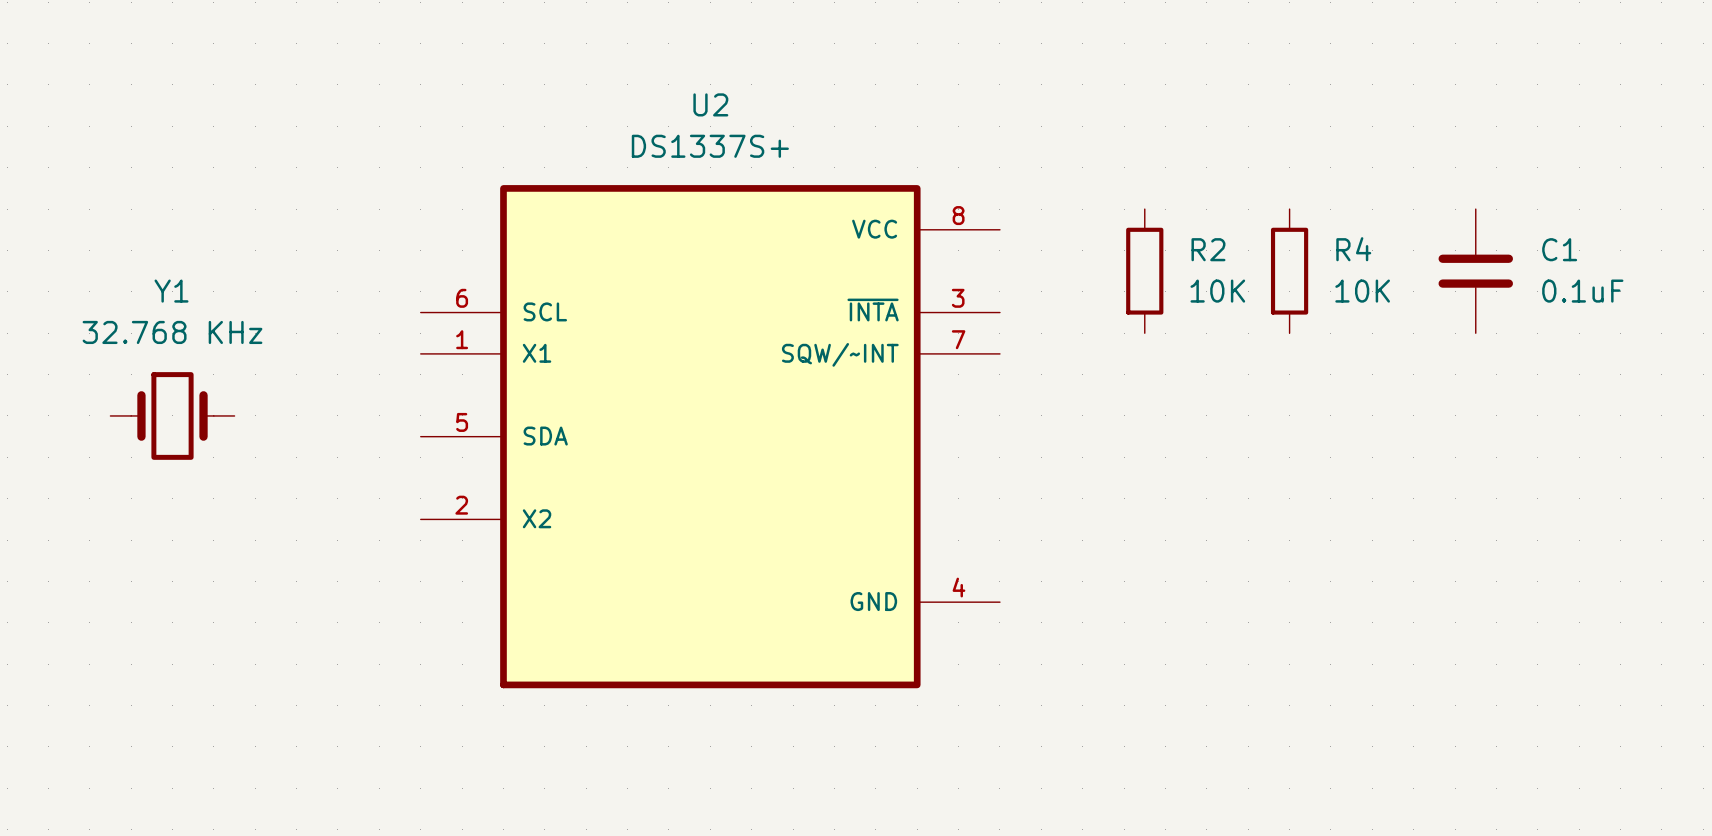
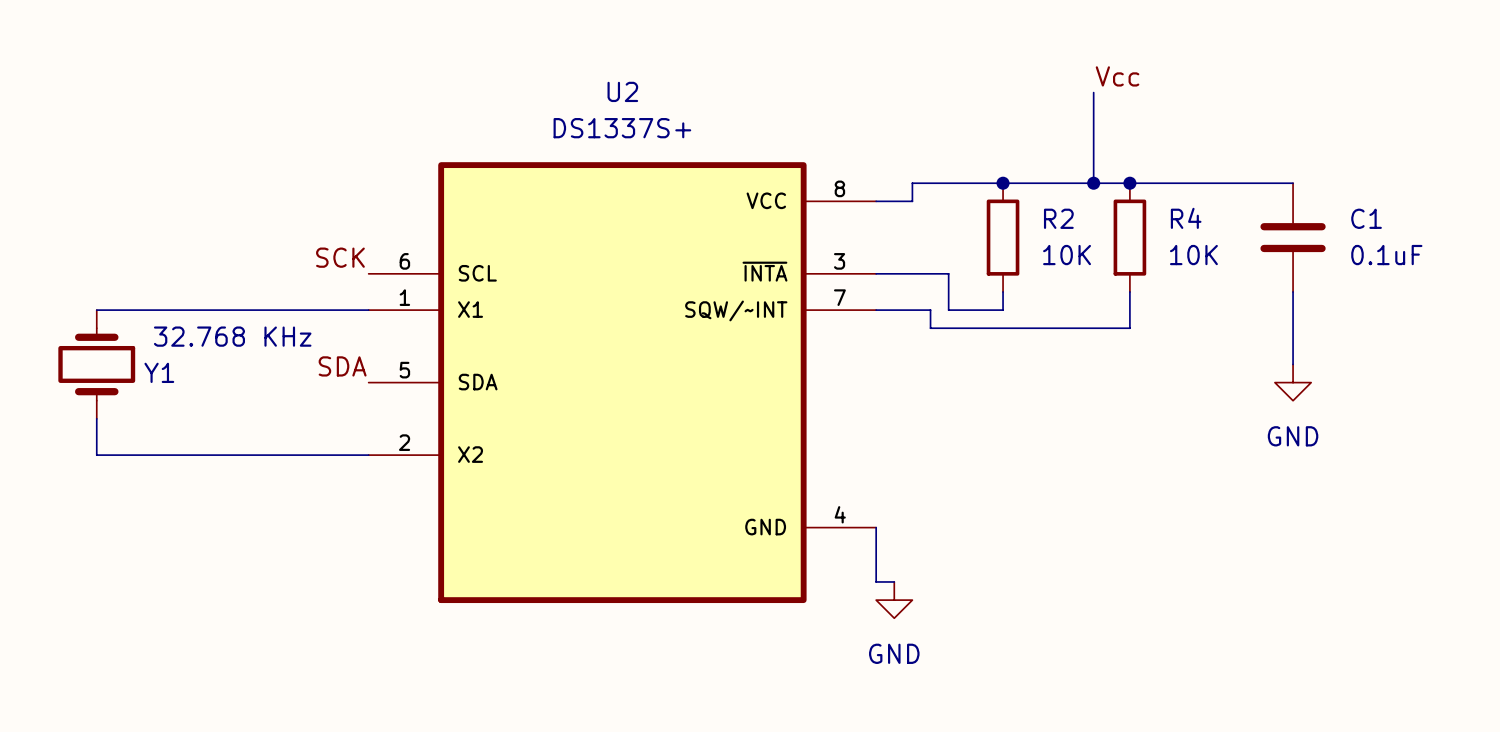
label: none -> Vcc (1117, 76)
wire: none -> (1093, 92) (1093, 183)
junction: none -> (1003, 183)
junction: none -> (1093, 183)
junction: none -> (1129, 183)
wire: none -> (1293, 183) (912, 183) (912, 201) (876, 201)
Y1 name position: Y1 (171, 291) -> Y1 (159, 372)
label: none -> SCK (340, 257)
wire: none -> (876, 273) (948, 273) (948, 310) (1003, 310) (1003, 291)
Y1 value position: 32.768 KHz (172, 332) -> 32.768 KHz (232, 336)
wire: none -> (1129, 291) (1129, 328) (930, 328) (930, 310) (876, 310)
wire: none -> (1293, 291) (1293, 364)
wire: none -> (96, 310) (368, 310)
Y1 rotation: 0° (172, 415) -> 90° clockwise (96, 364)
label: none -> SDA (342, 366)
power symbol: none -> GND (1293, 382)
wire: none -> (96, 418) (96, 455) (368, 455)
wire: none -> (876, 527) (876, 581) (894, 581)
power symbol: none -> GND (894, 600)

